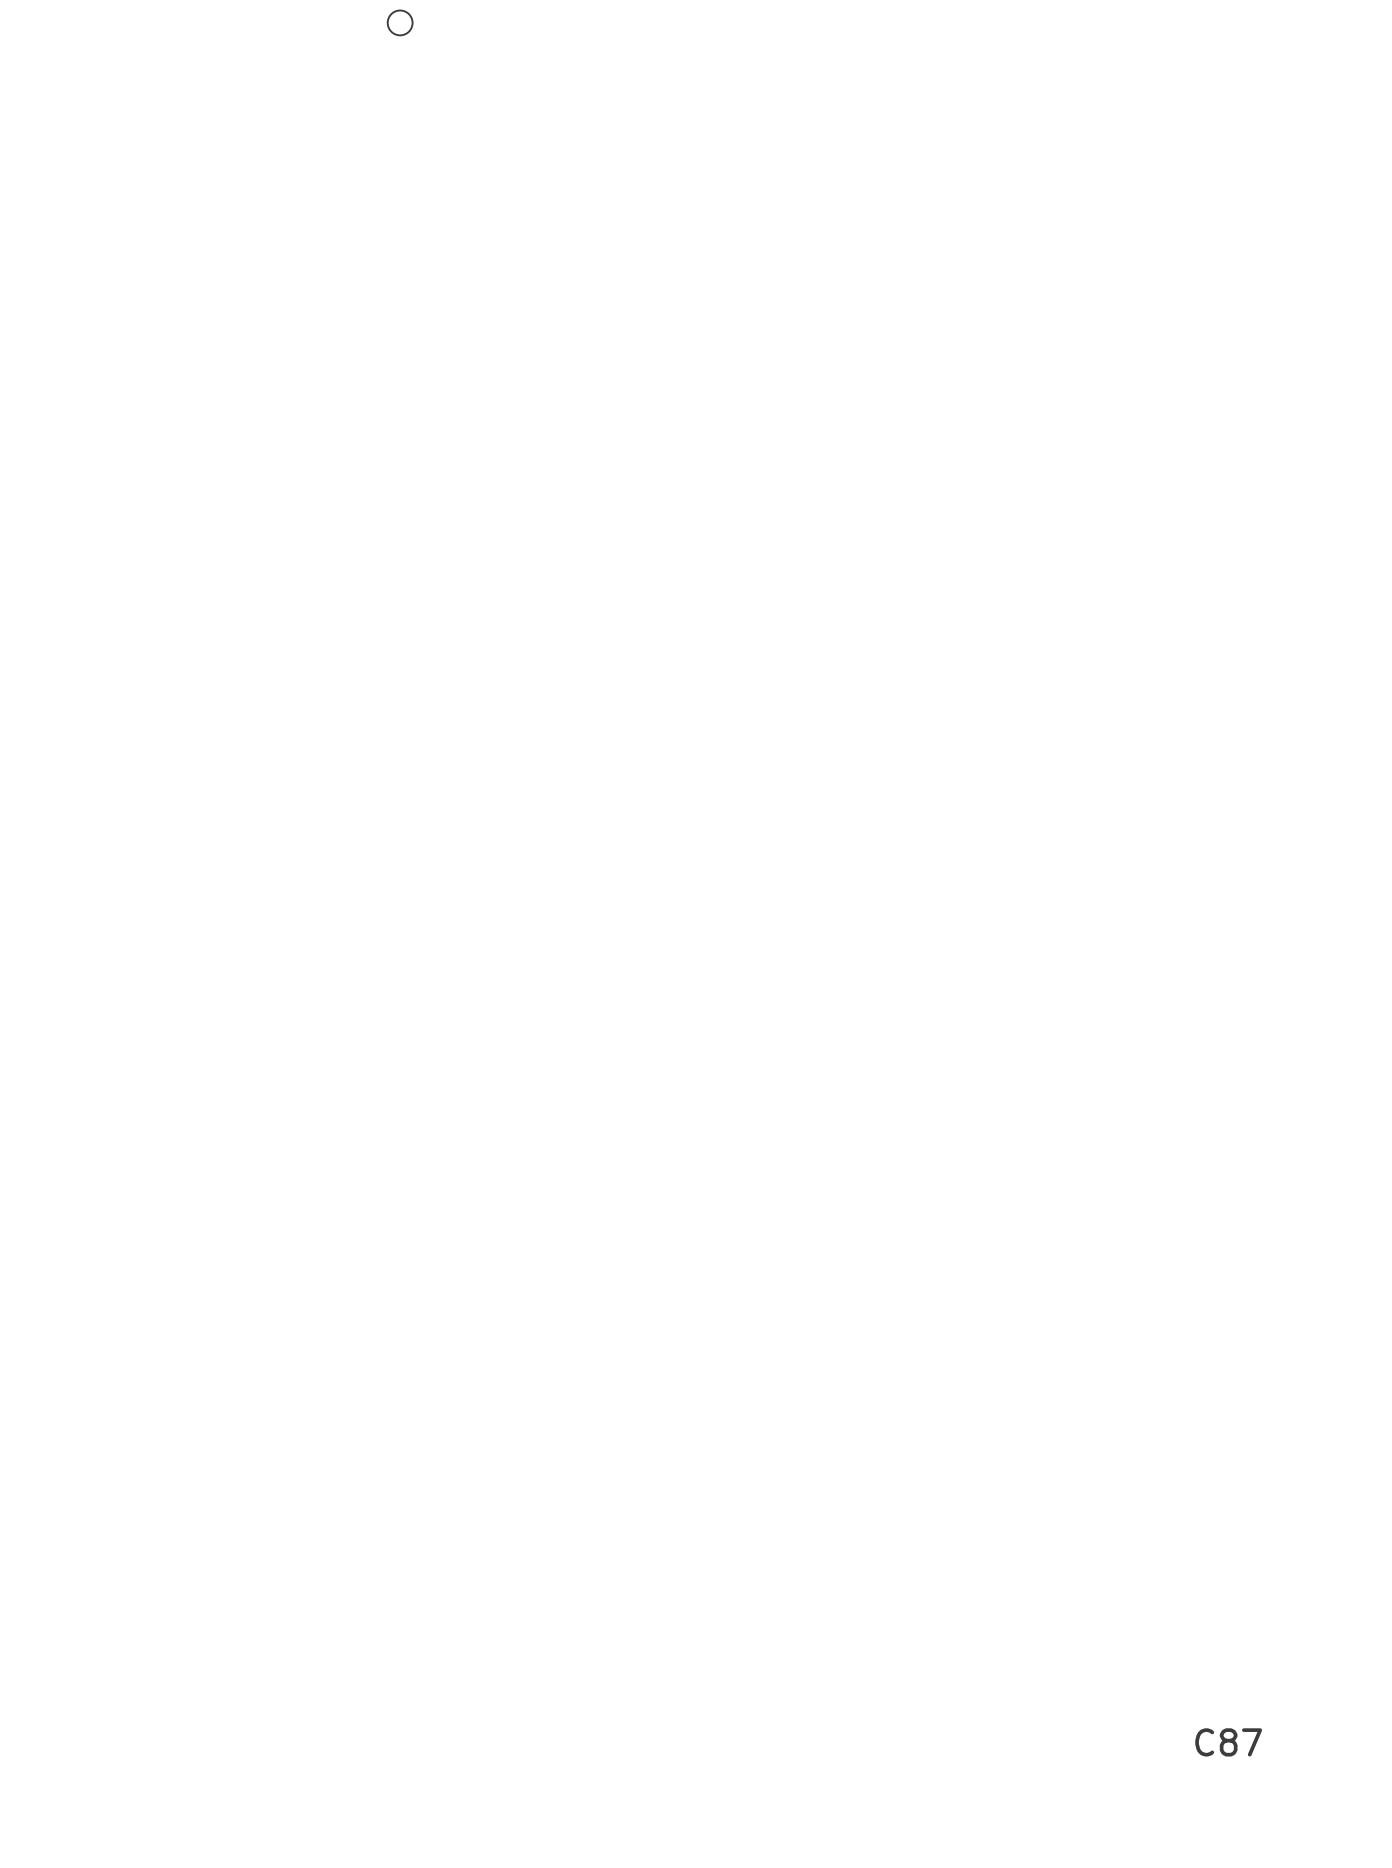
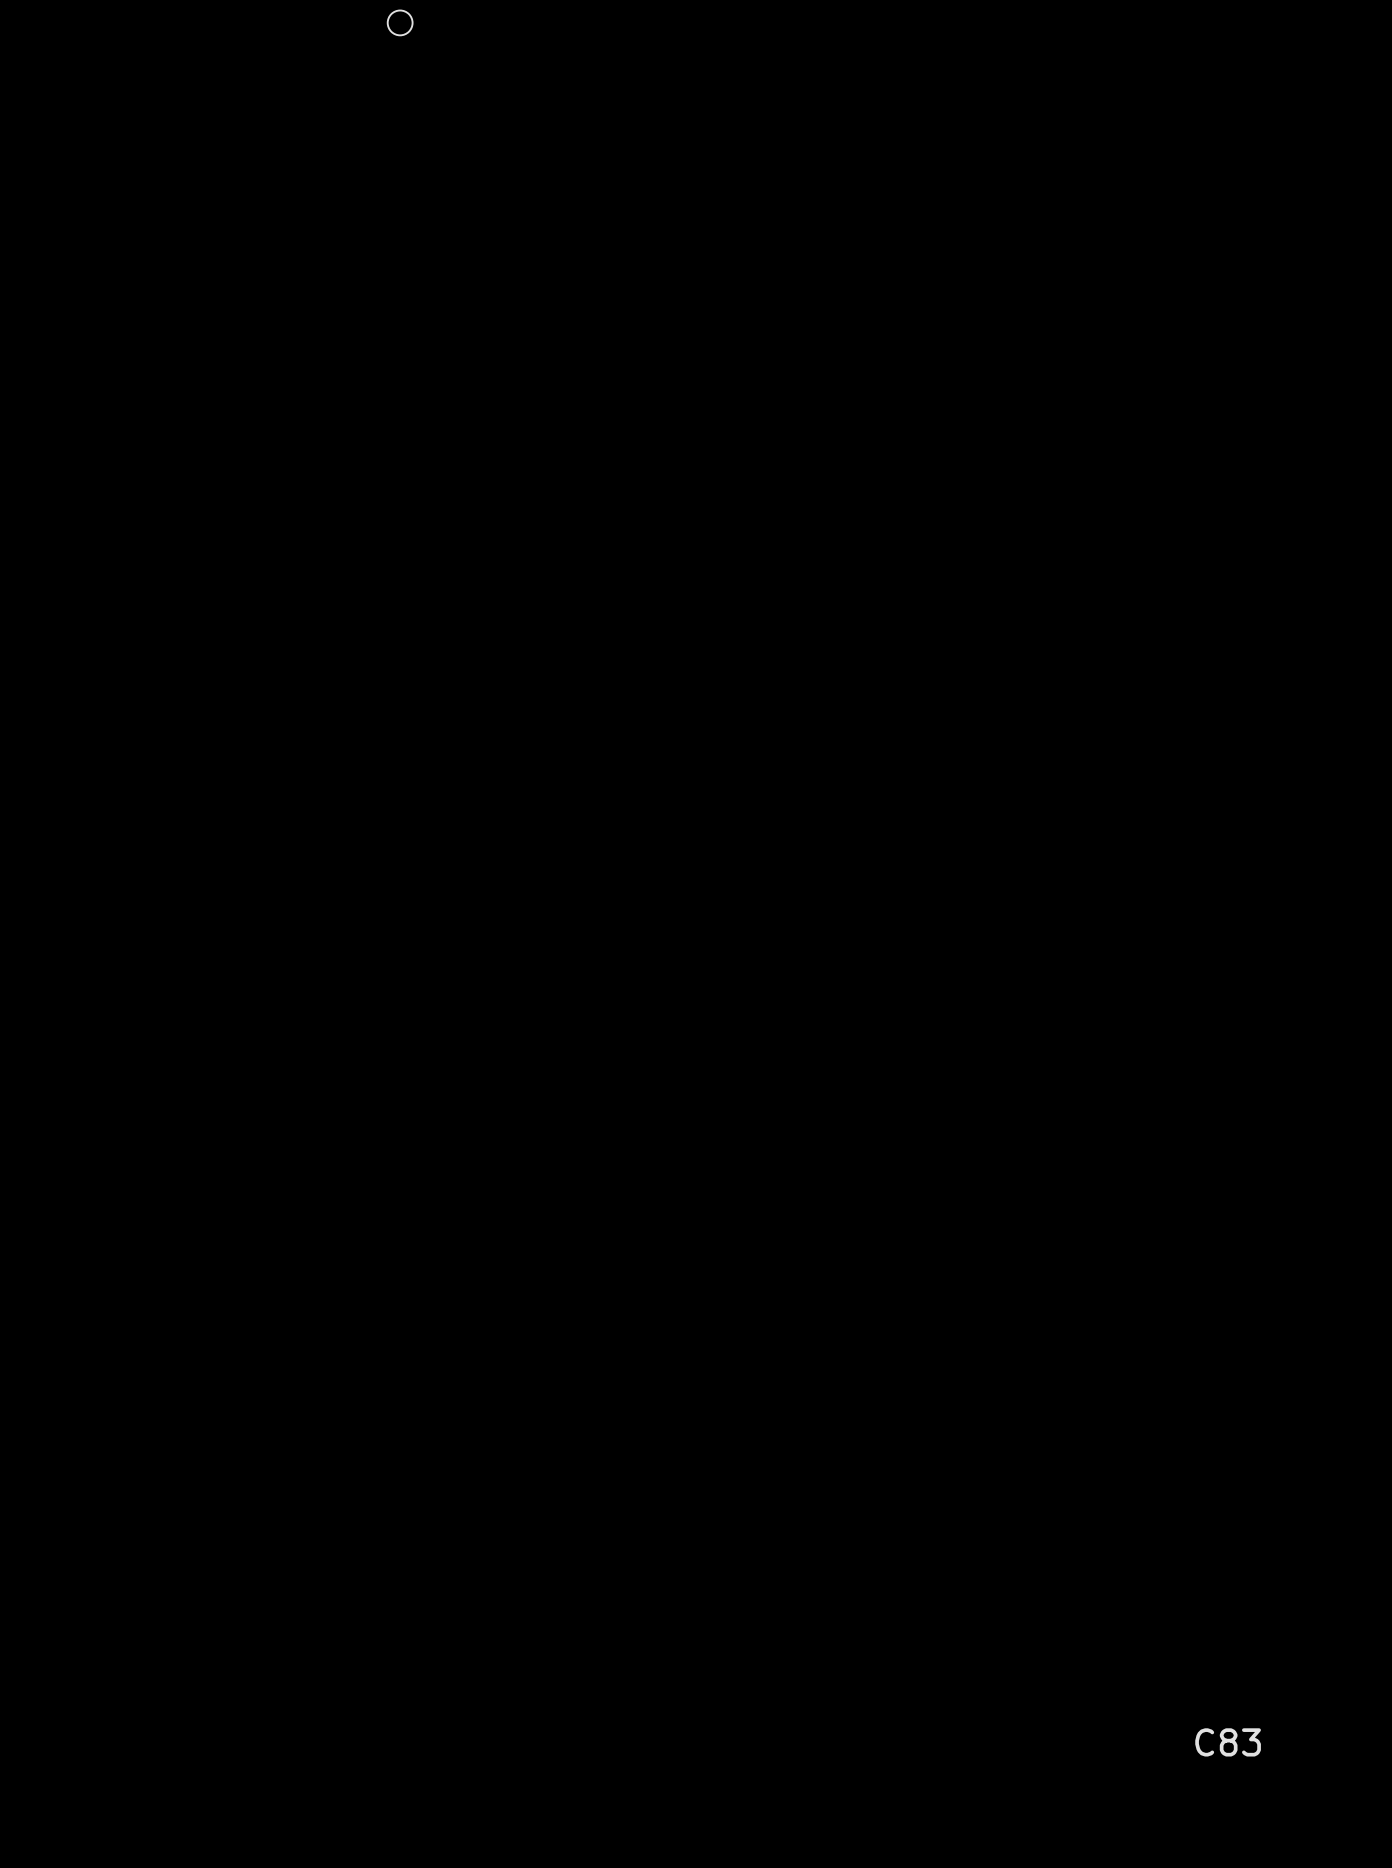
C87 name: C87 (1228, 1742) -> C83 (1228, 1742)

